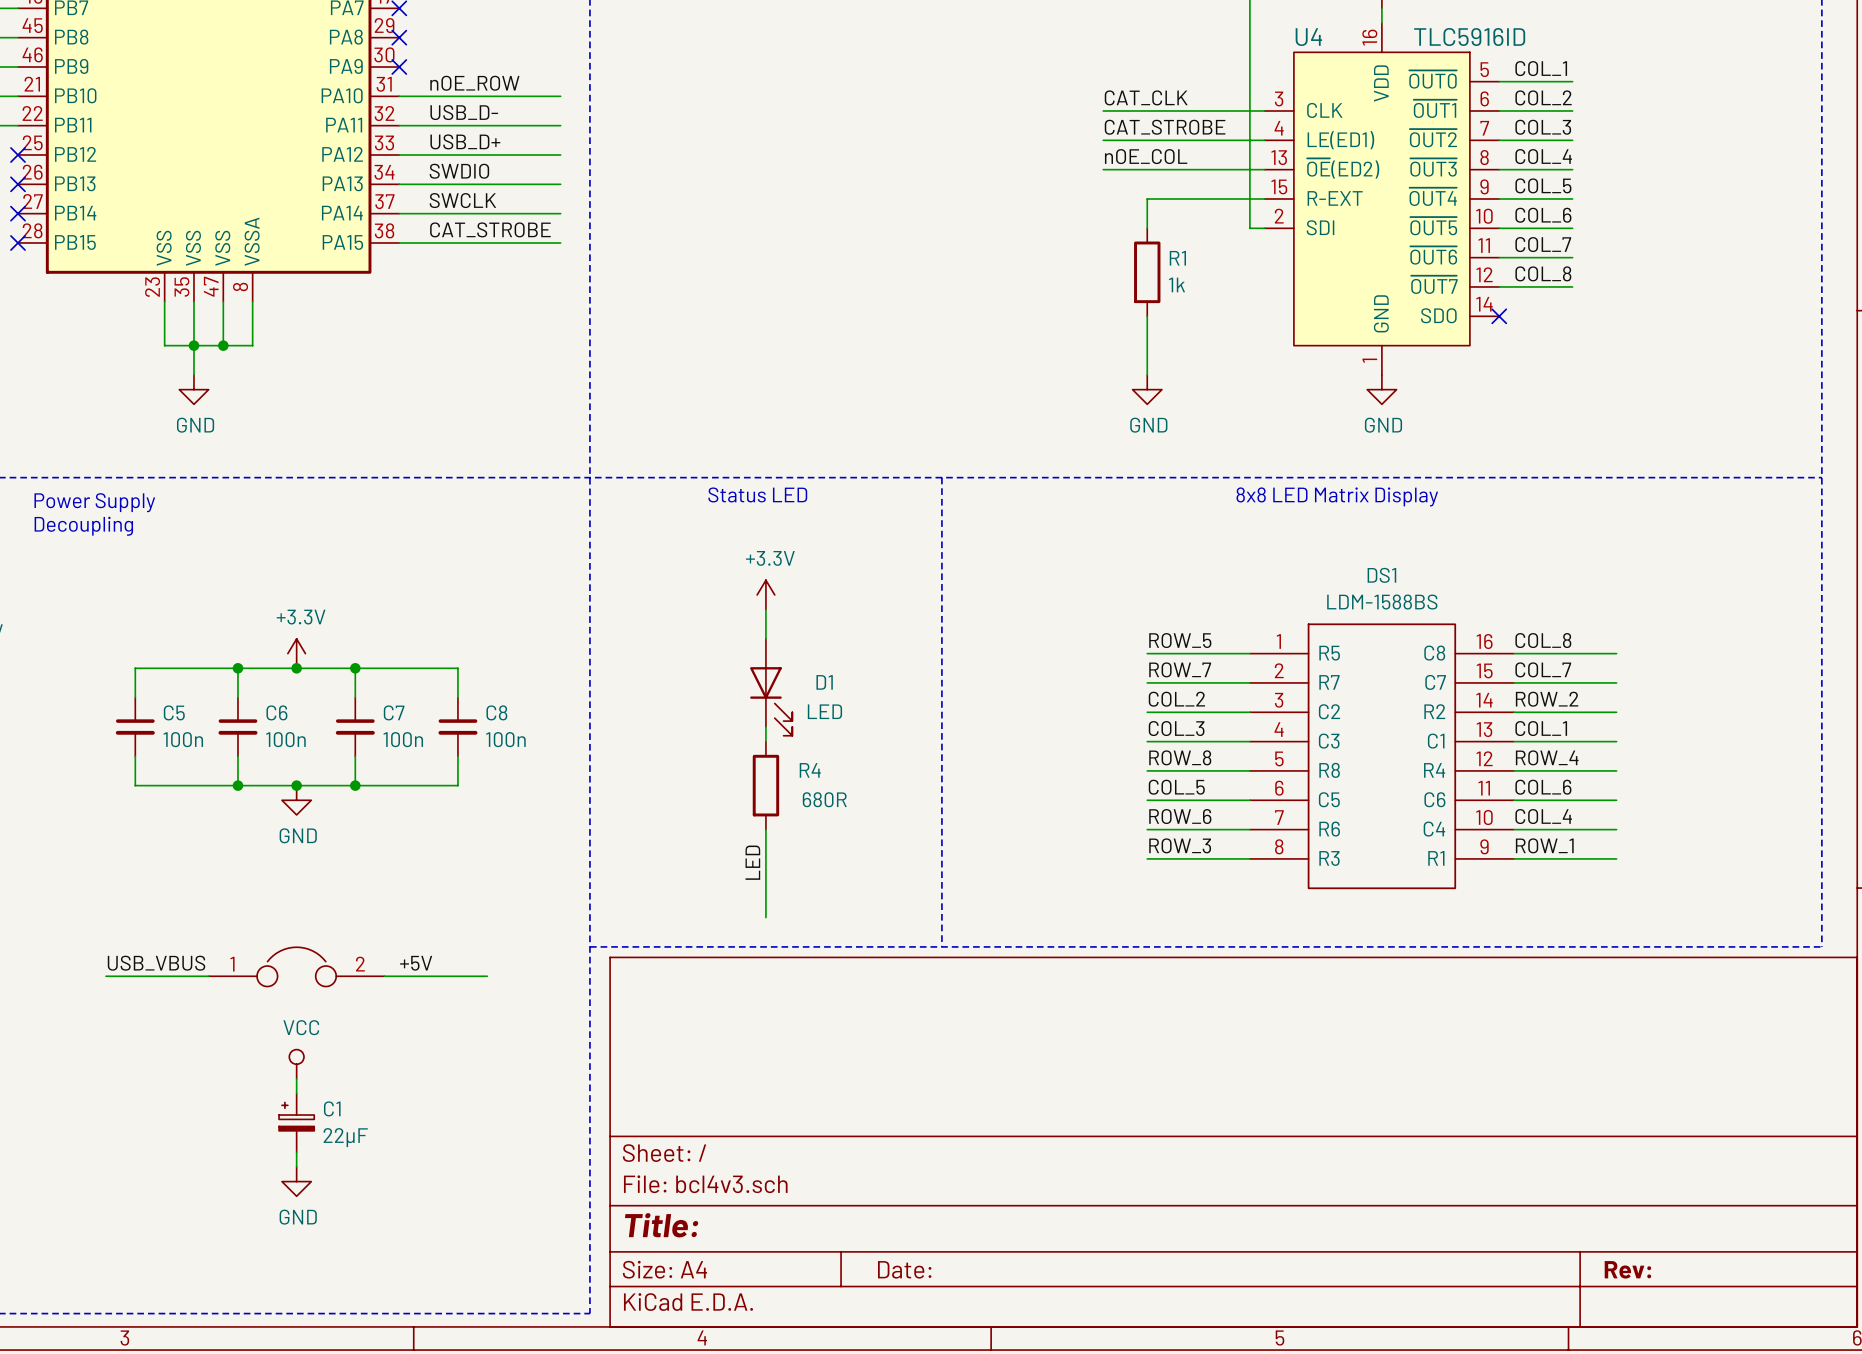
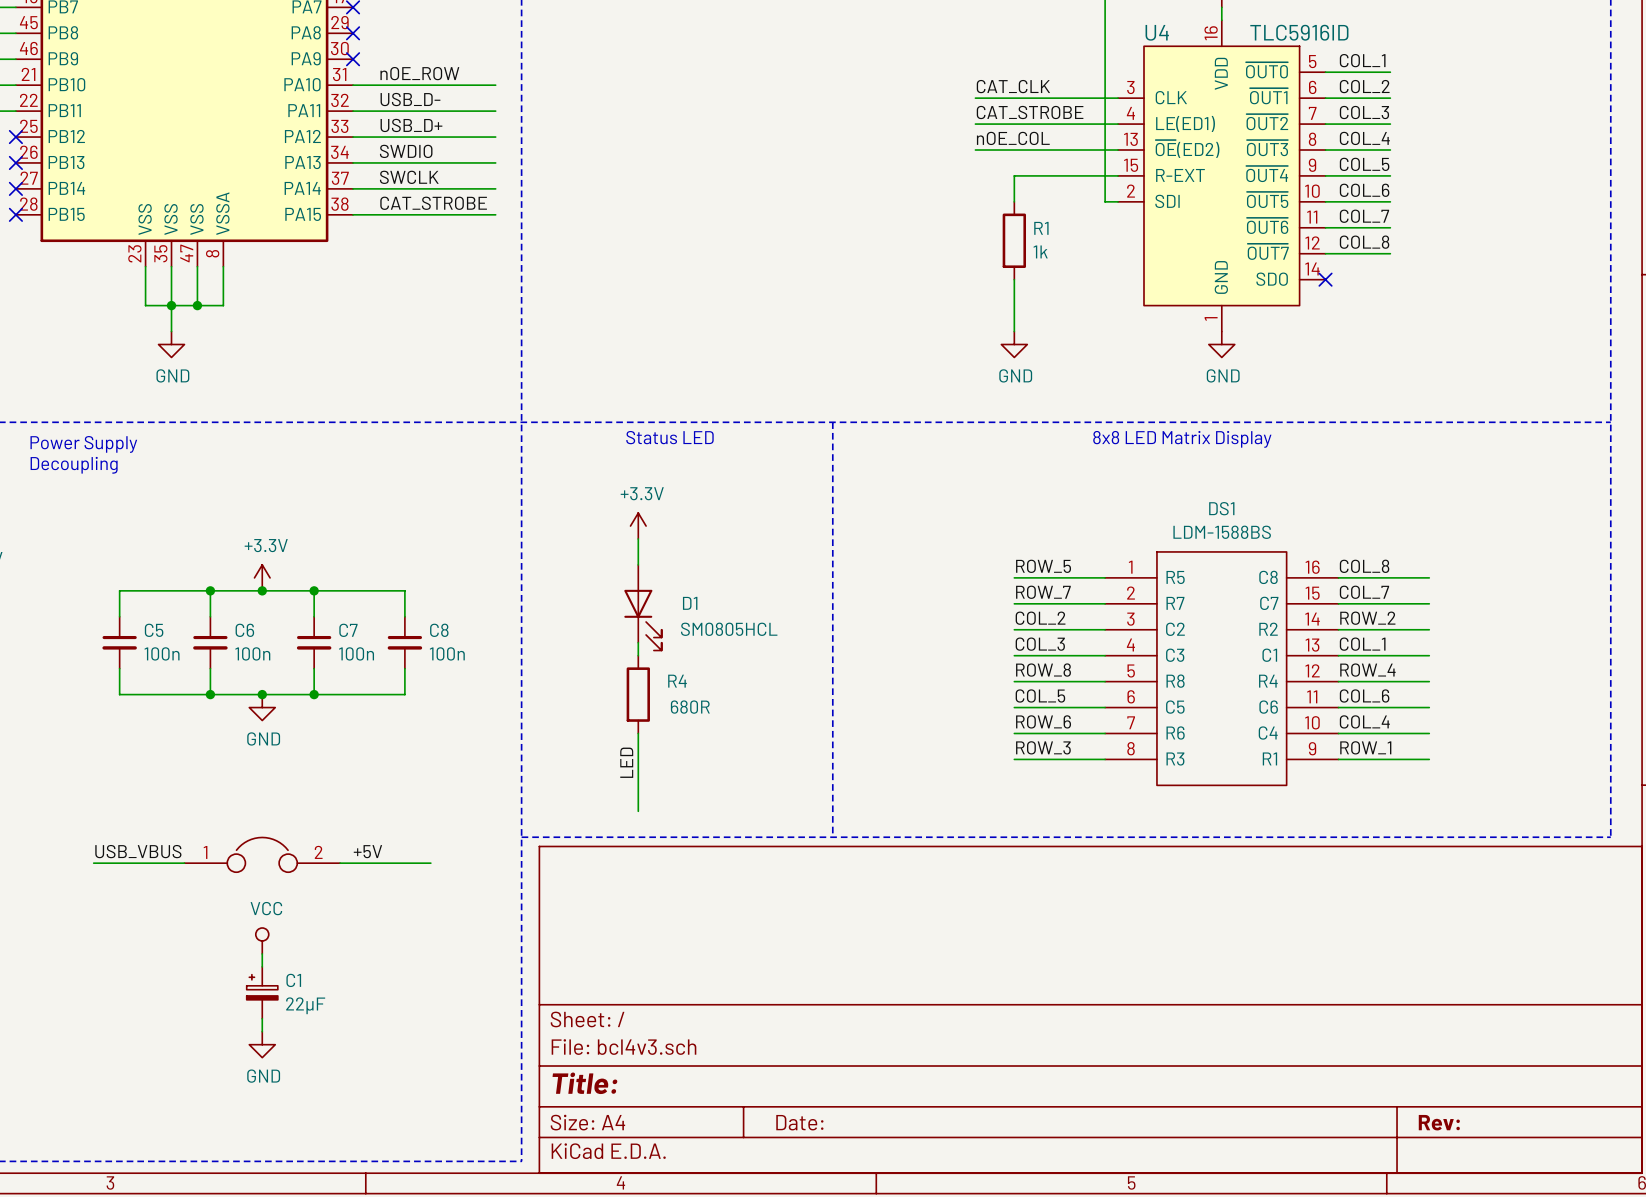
power symbol position: +3.3V (765, 594) -> +3.3V (638, 526)
wire: (765, 609) (765, 638) -> (638, 538) (638, 564)
D1 position: (771, 687) -> (642, 607)
D1 value: LED (824, 711) -> SM0805HCL (729, 629)
wire: (765, 726) (765, 741) -> (638, 642) (638, 655)
R4 position: (765, 785) -> (638, 694)
wire: (765, 829) (765, 917) -> (638, 733) (638, 811)
label position: LED (752, 862) -> LED (626, 762)

